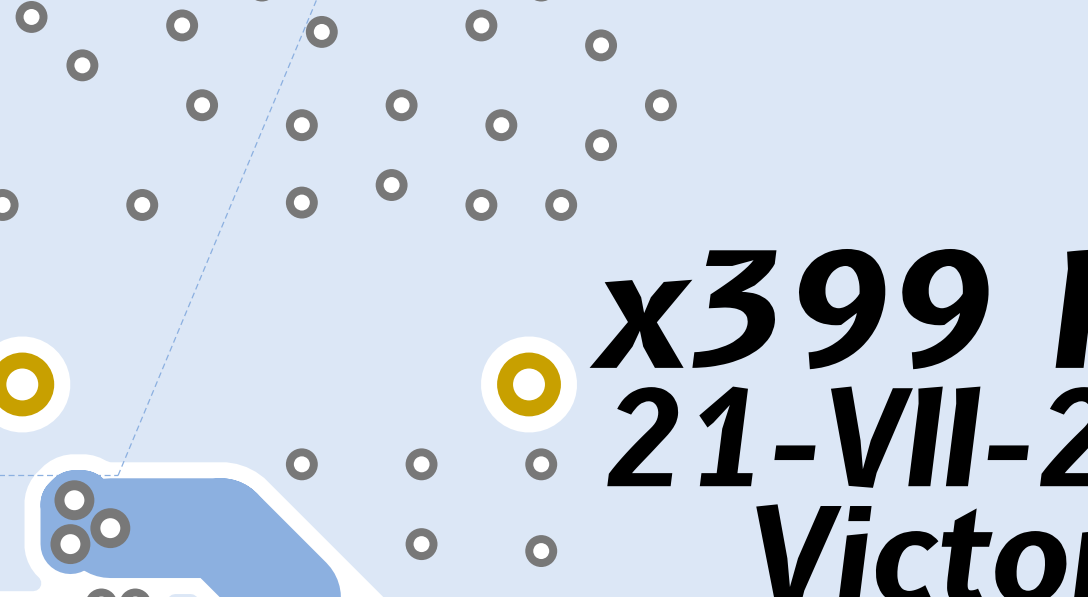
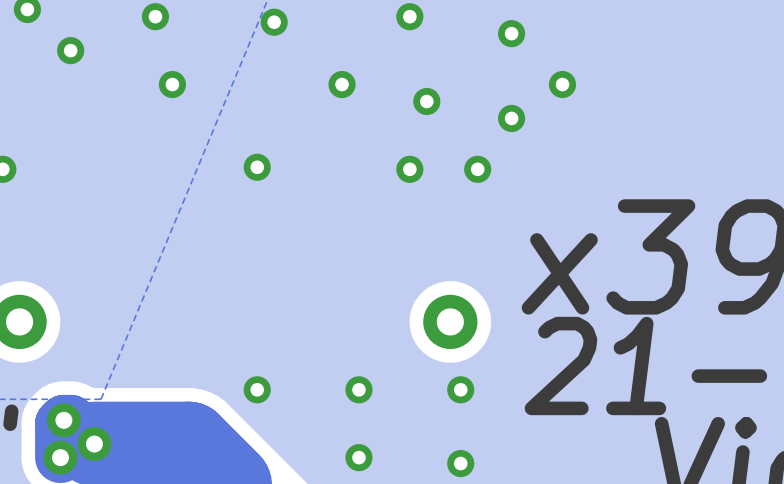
via: (301, 125) -> none
via: (391, 185) -> none
via: (142, 204) -> none

